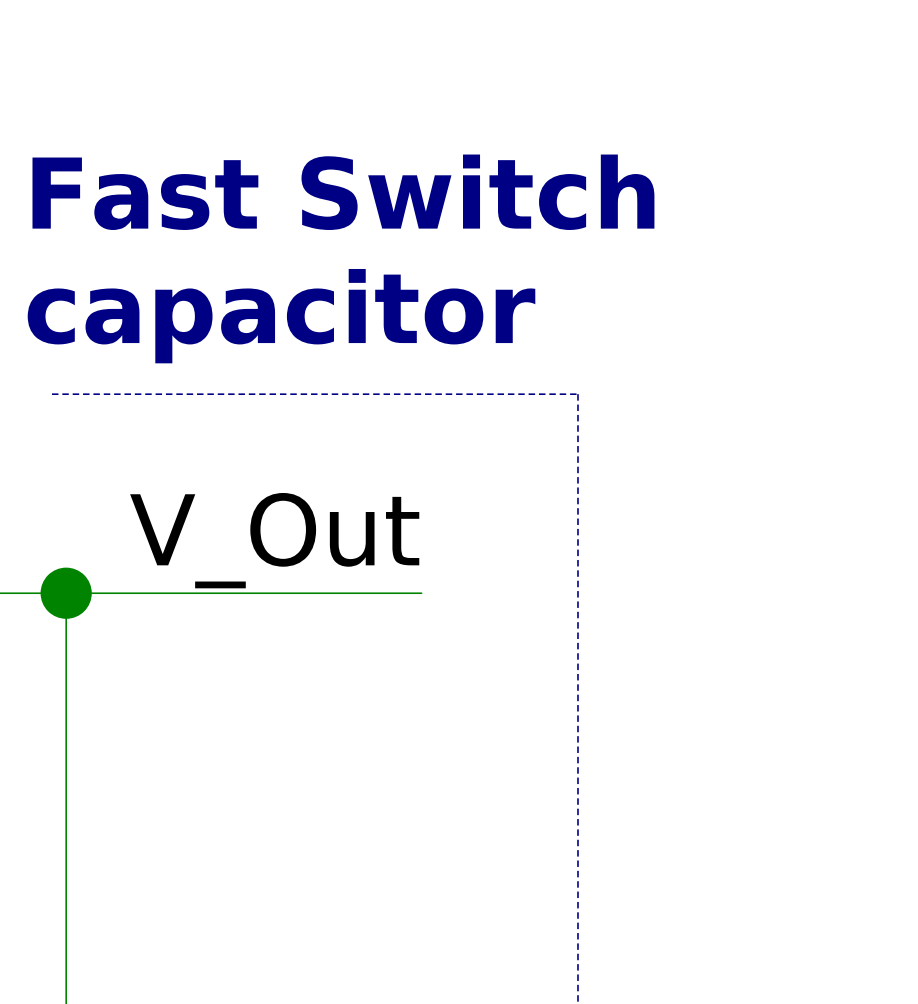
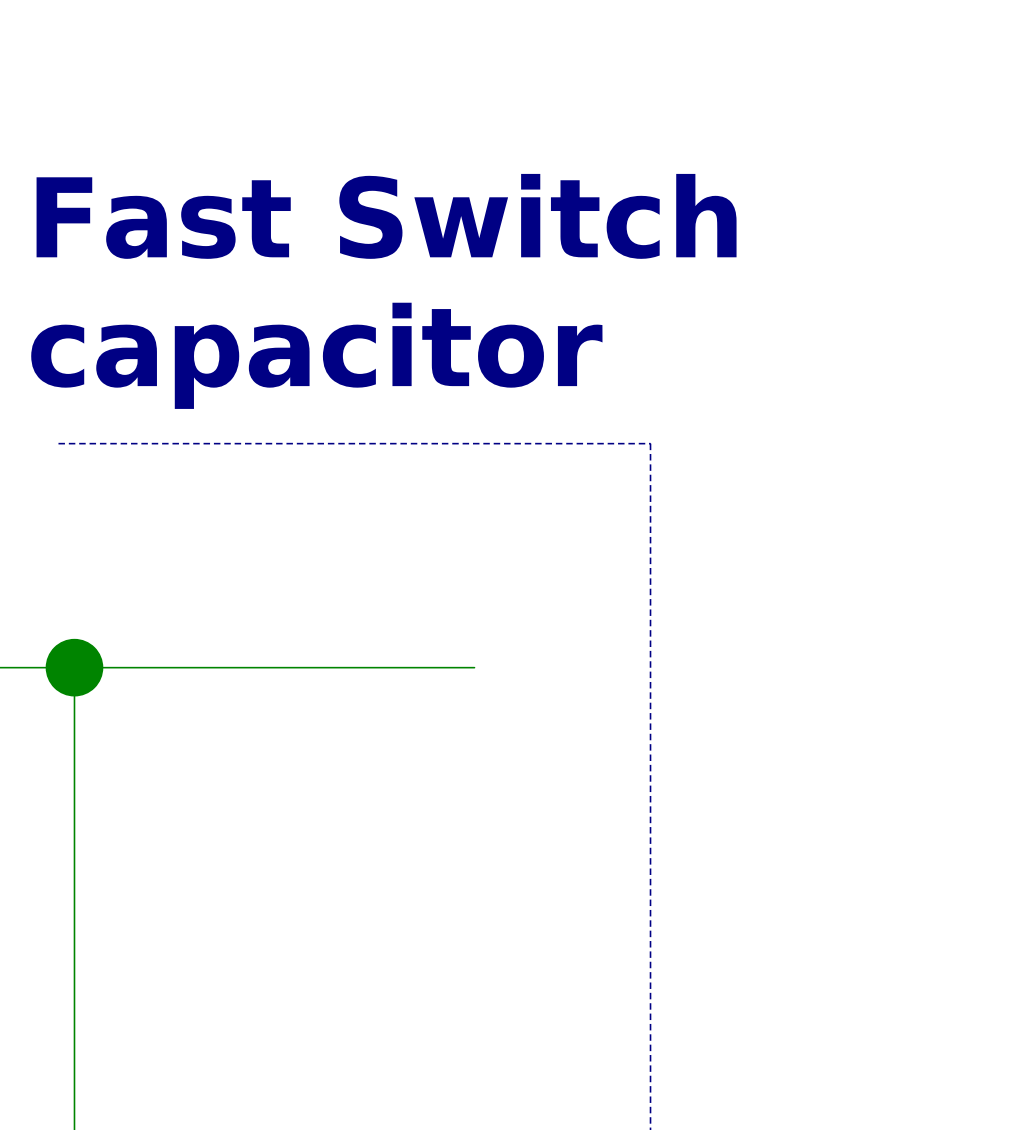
label: V_Out (274, 540) -> none

